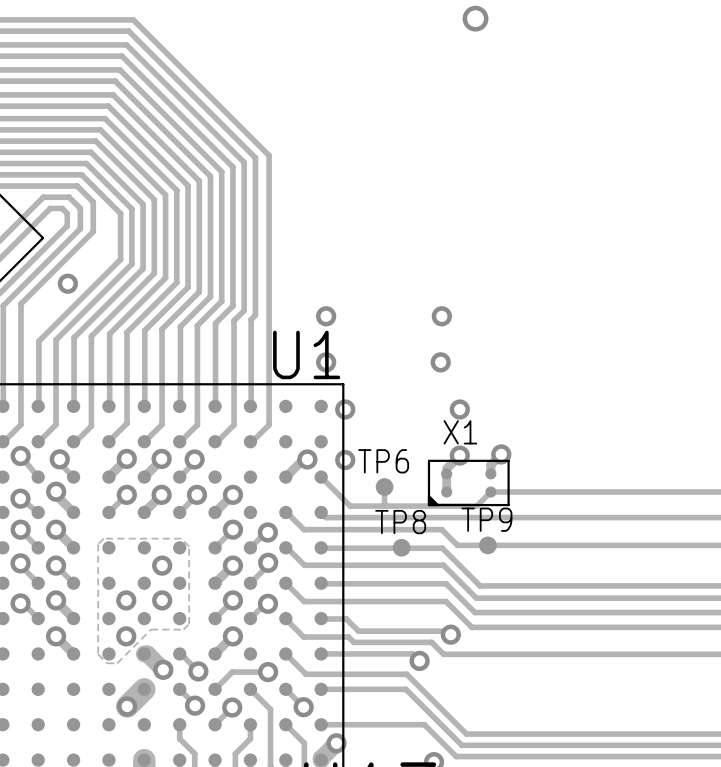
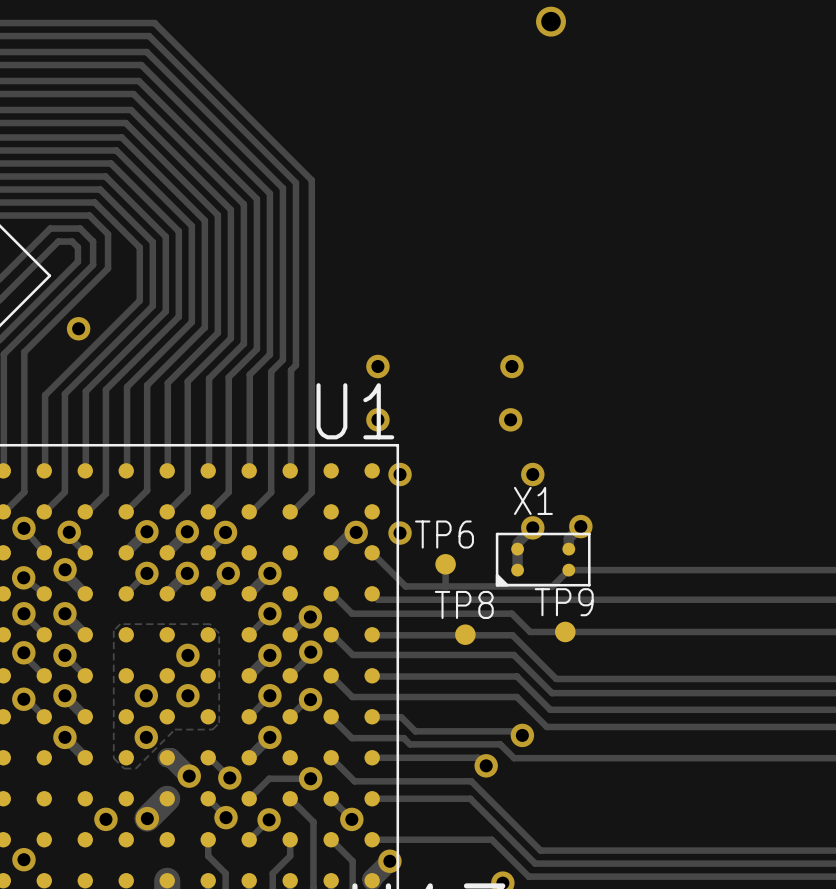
via: none -> (105, 819)
via: none -> (23, 859)

